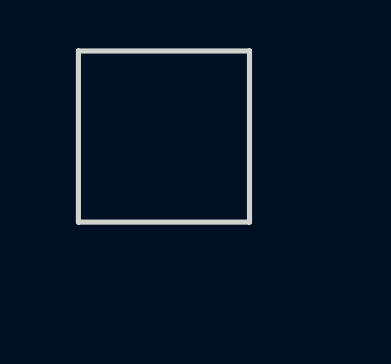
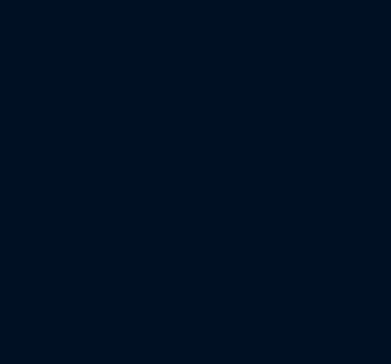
board edge: (78, 50) (249, 50) (249, 222) (78, 222) (78, 50) -> none

